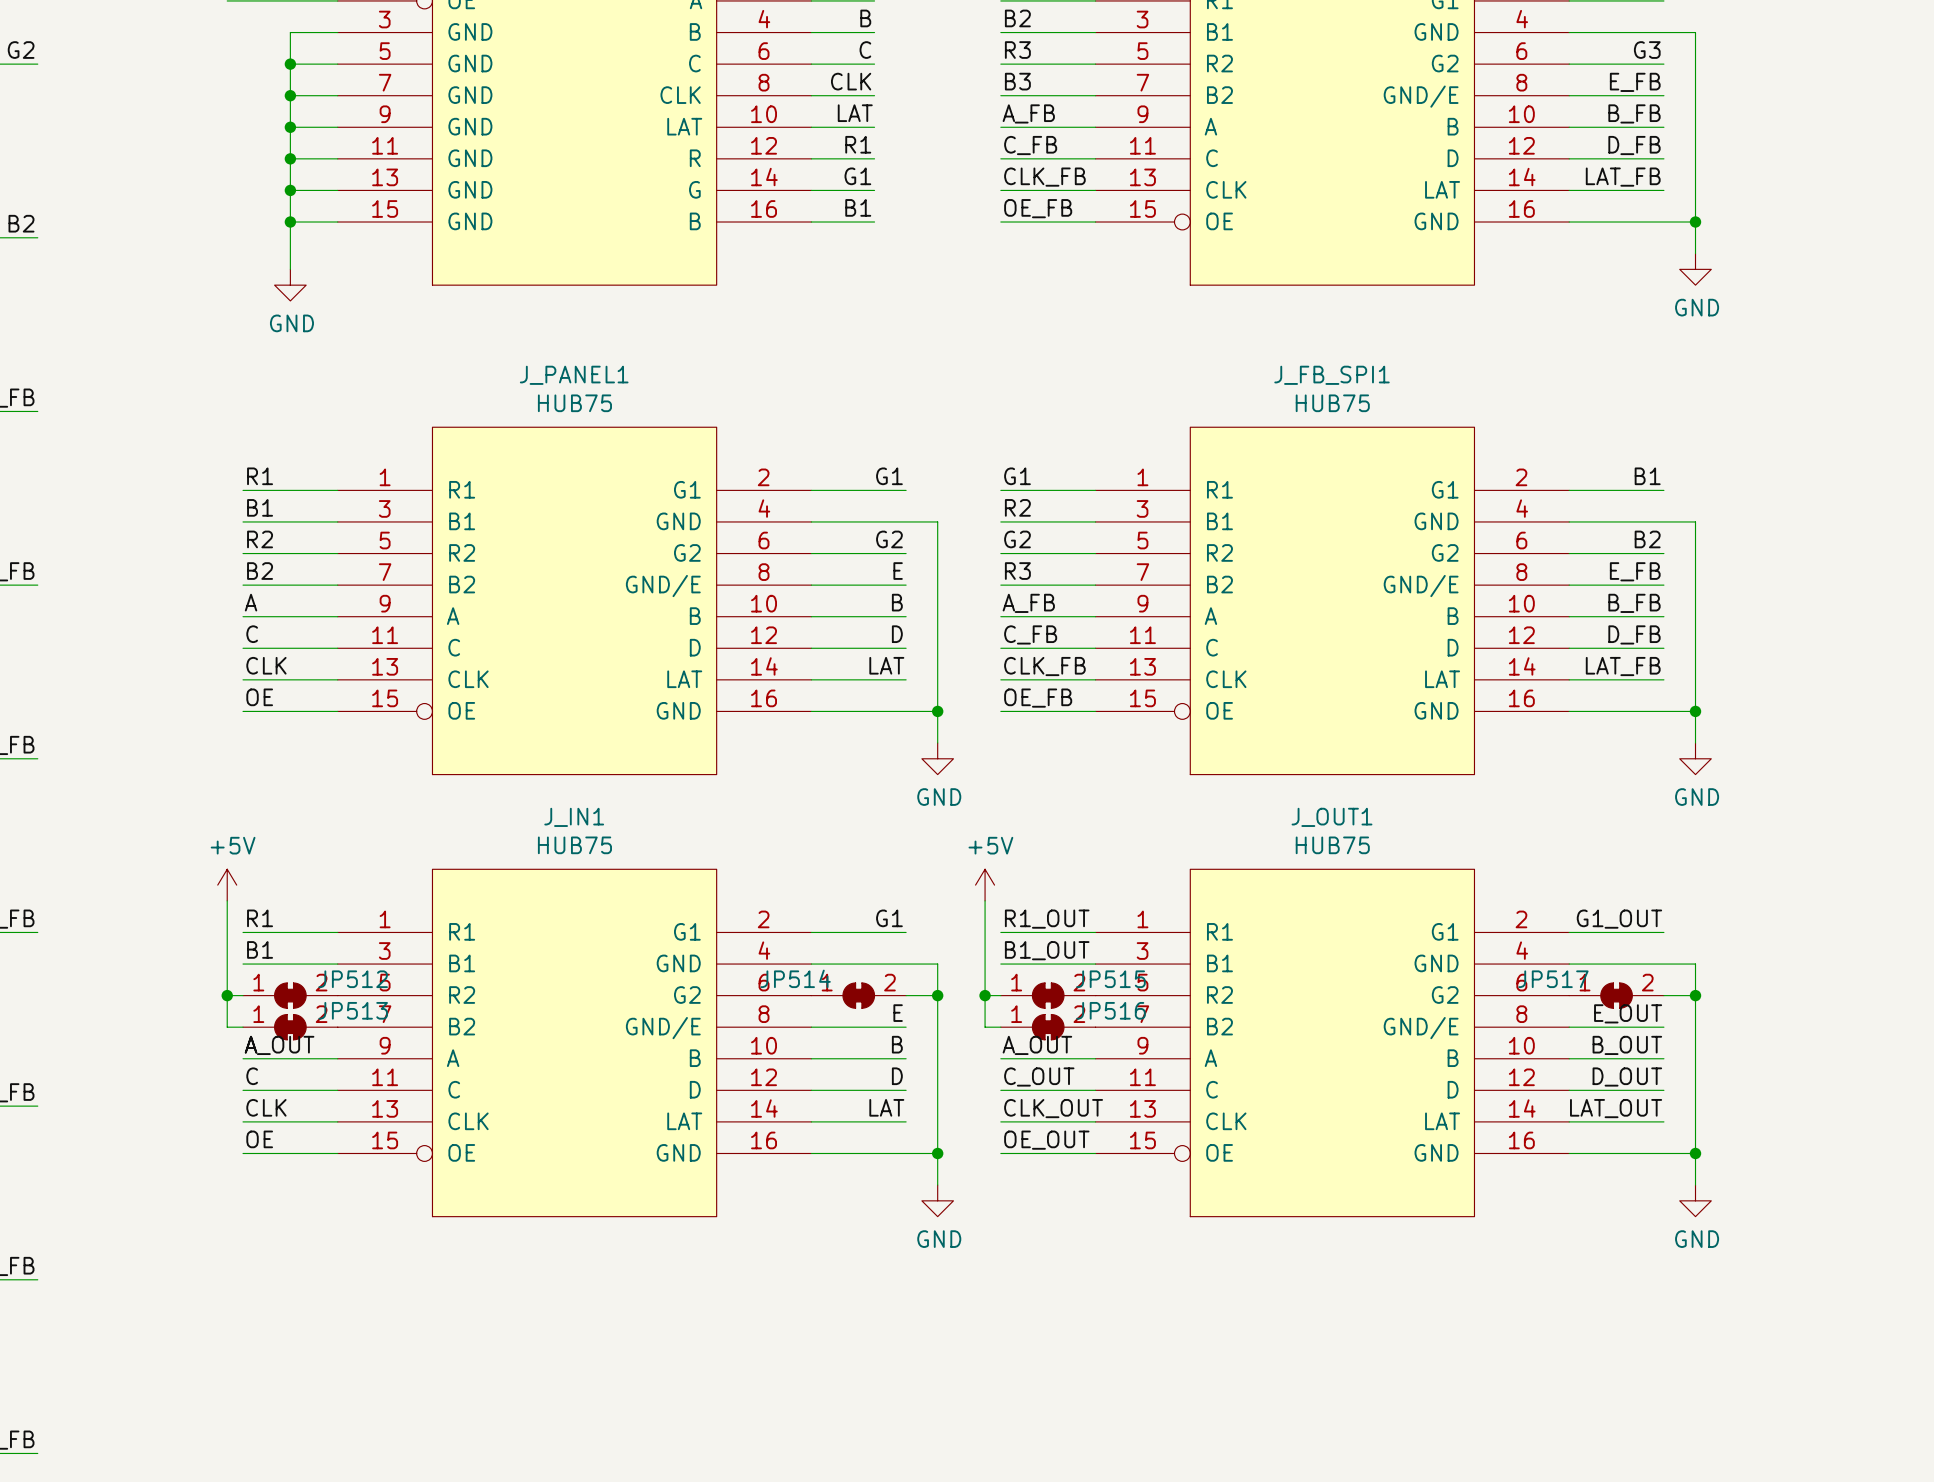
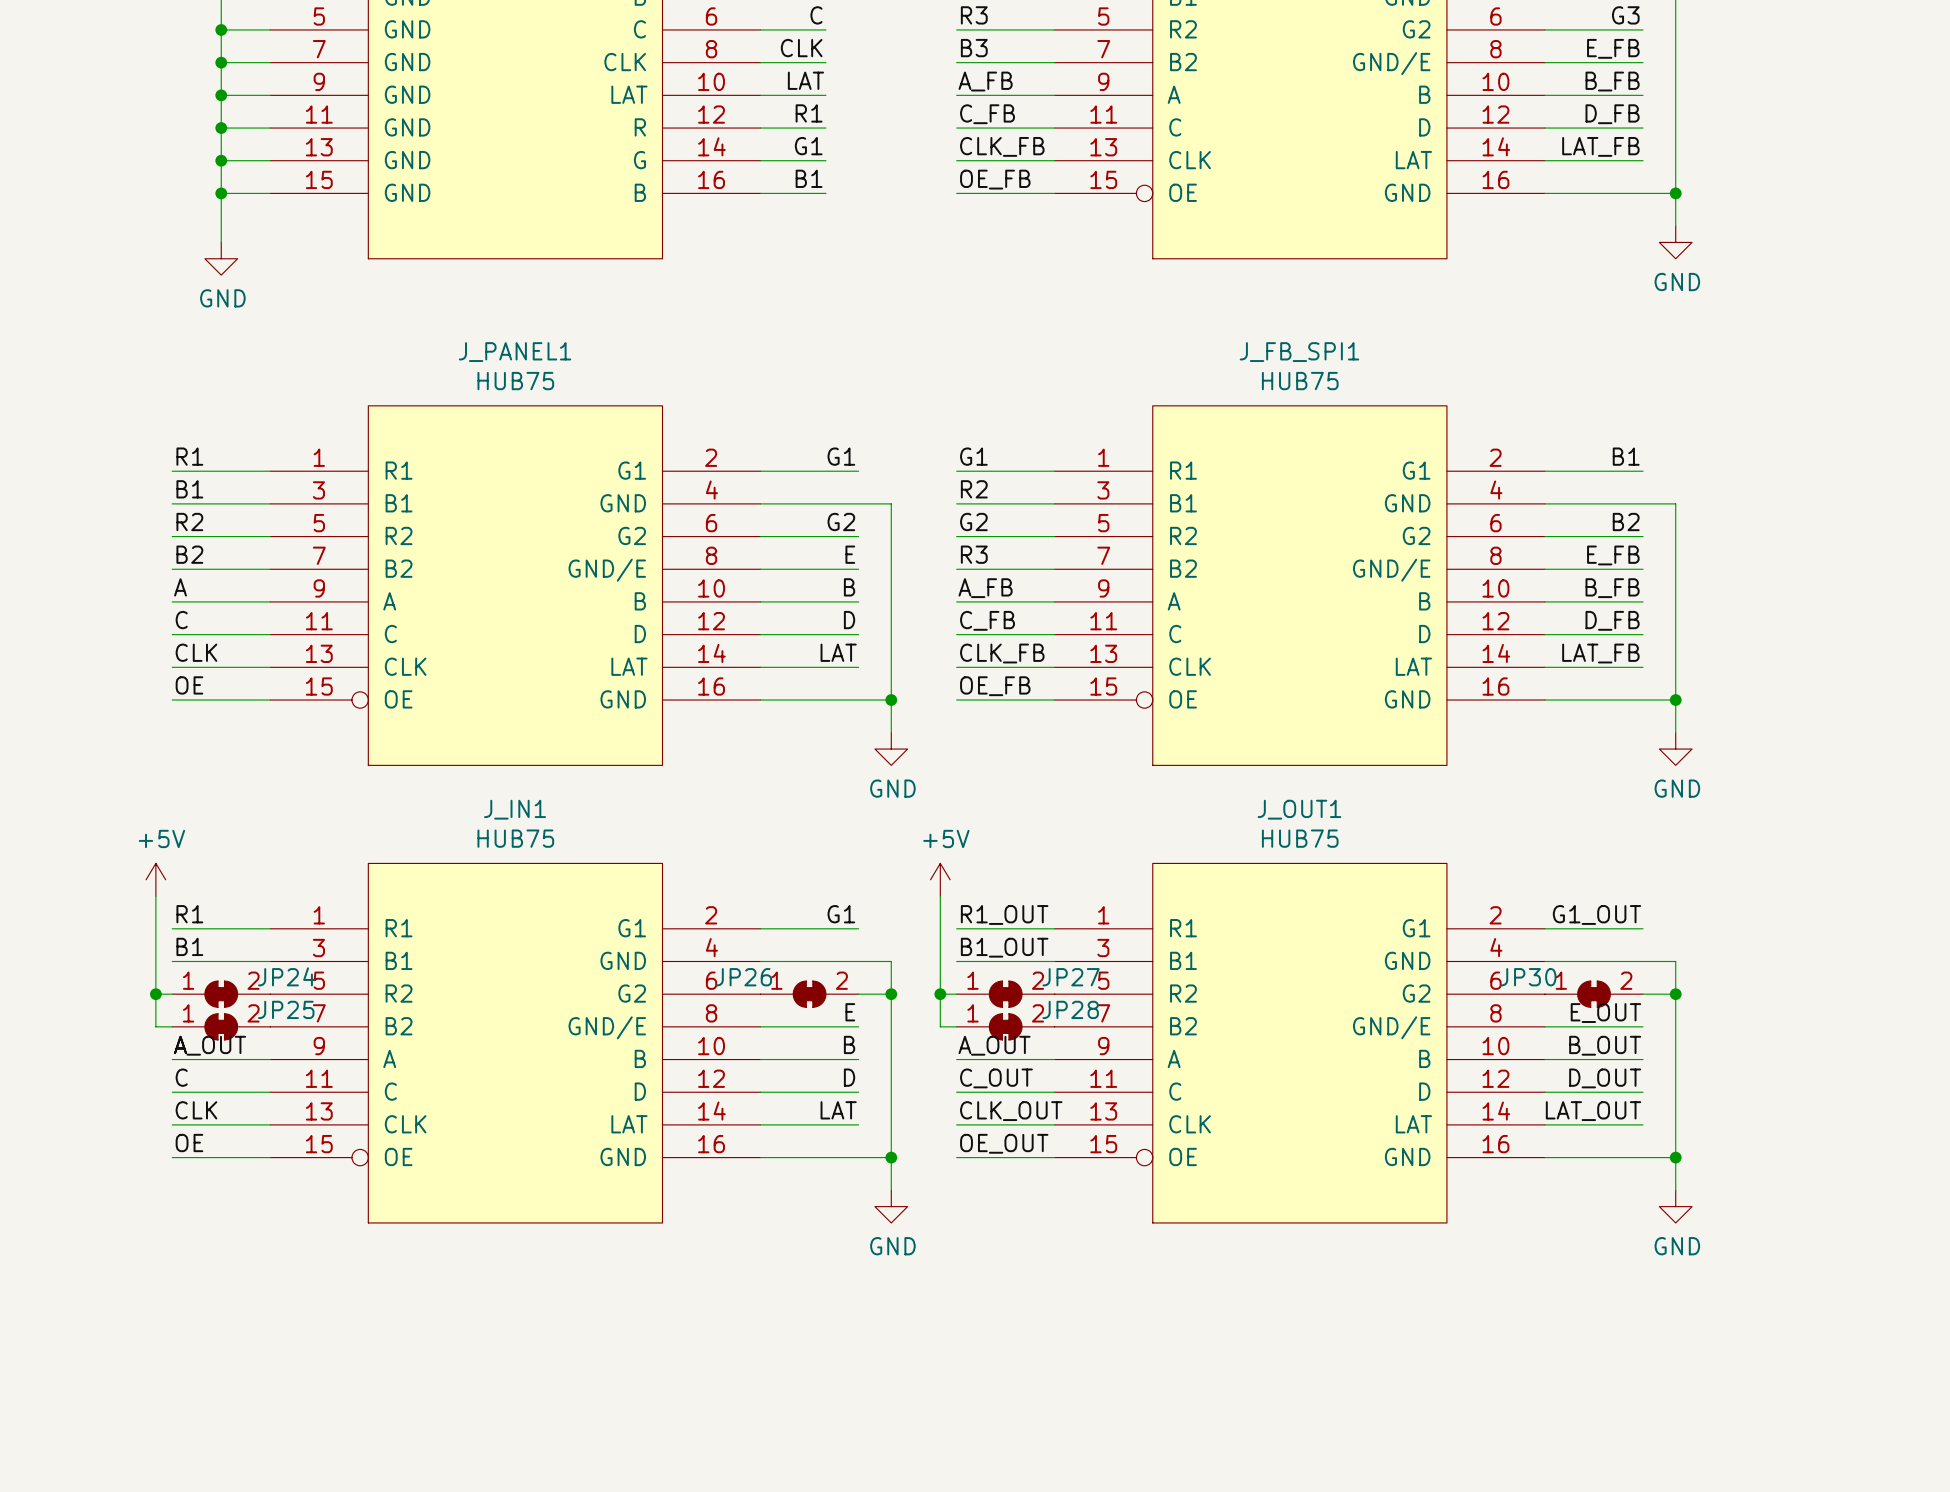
JP514 name: JP514 (795, 978) -> JP26 (743, 977)
JP512 name: JP512 (353, 979) -> JP24 (286, 976)
JP515 name: JP515 (1110, 979) -> JP27 (1071, 977)
JP517 name: JP517 (1553, 979) -> JP30 (1528, 977)
JP513 name: JP513 (353, 1010) -> JP25 (286, 1009)
JP516 name: JP516 (1110, 1010) -> JP28 (1070, 1009)

